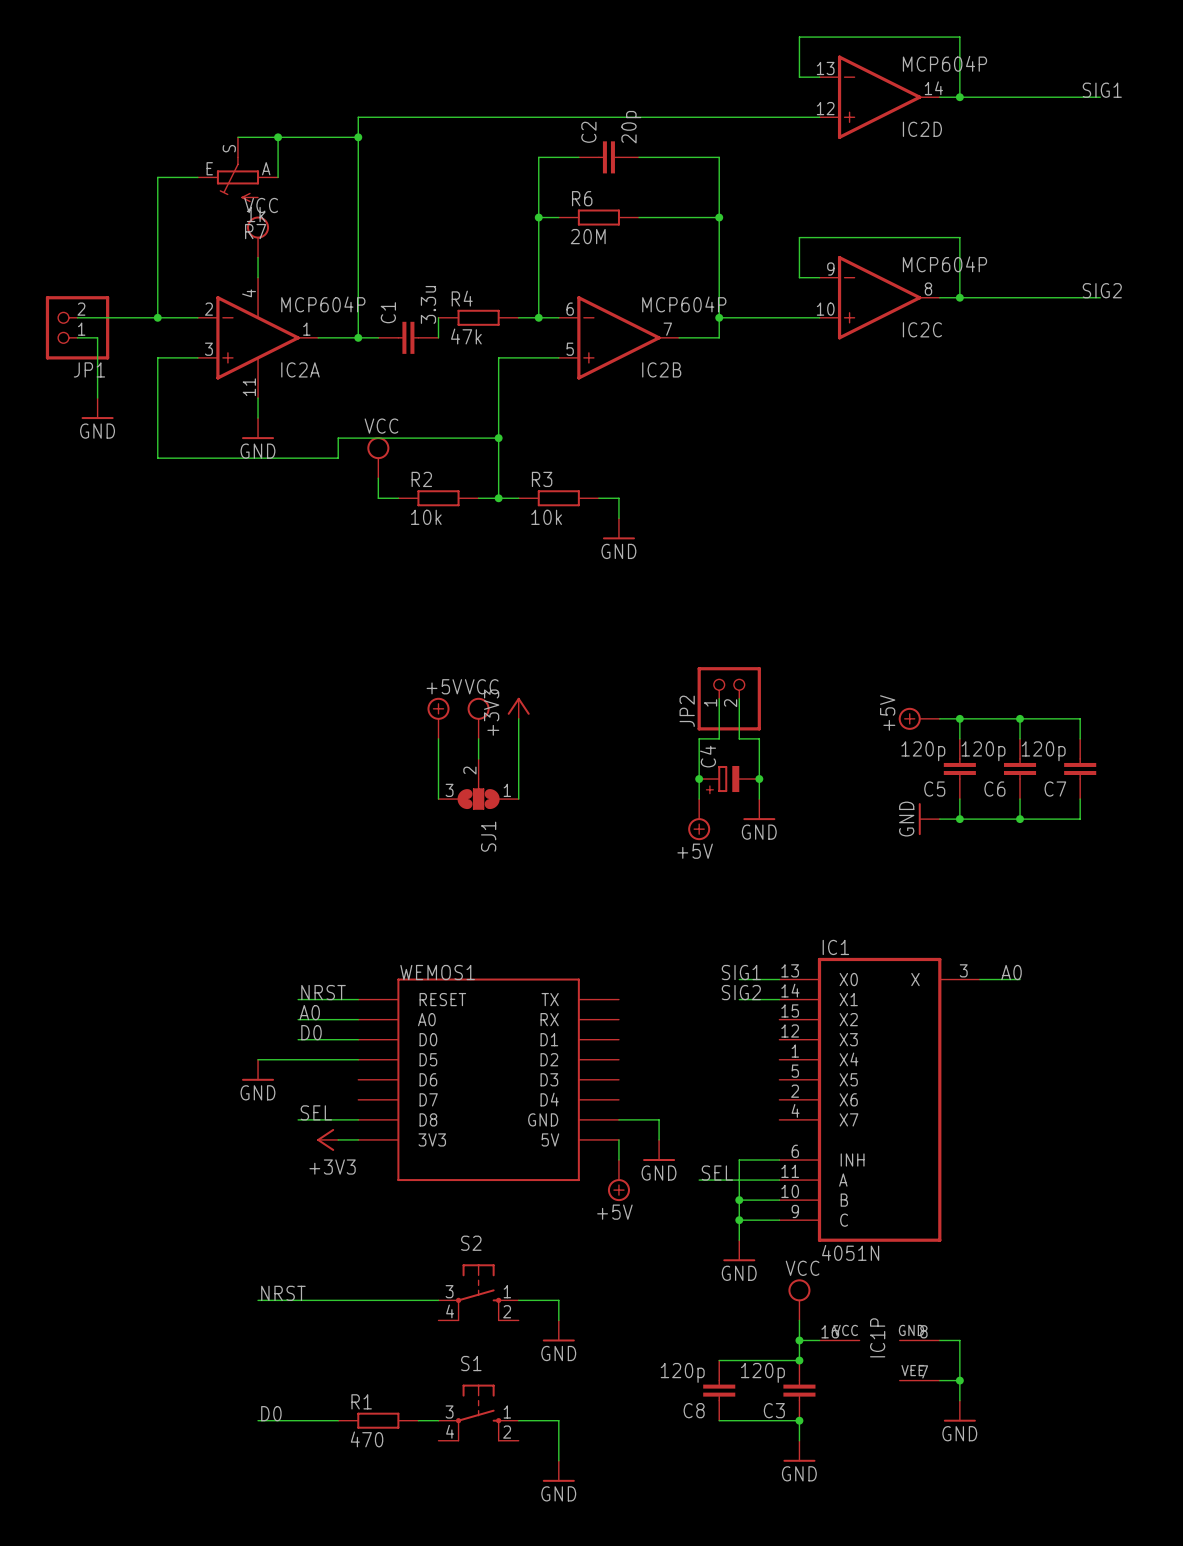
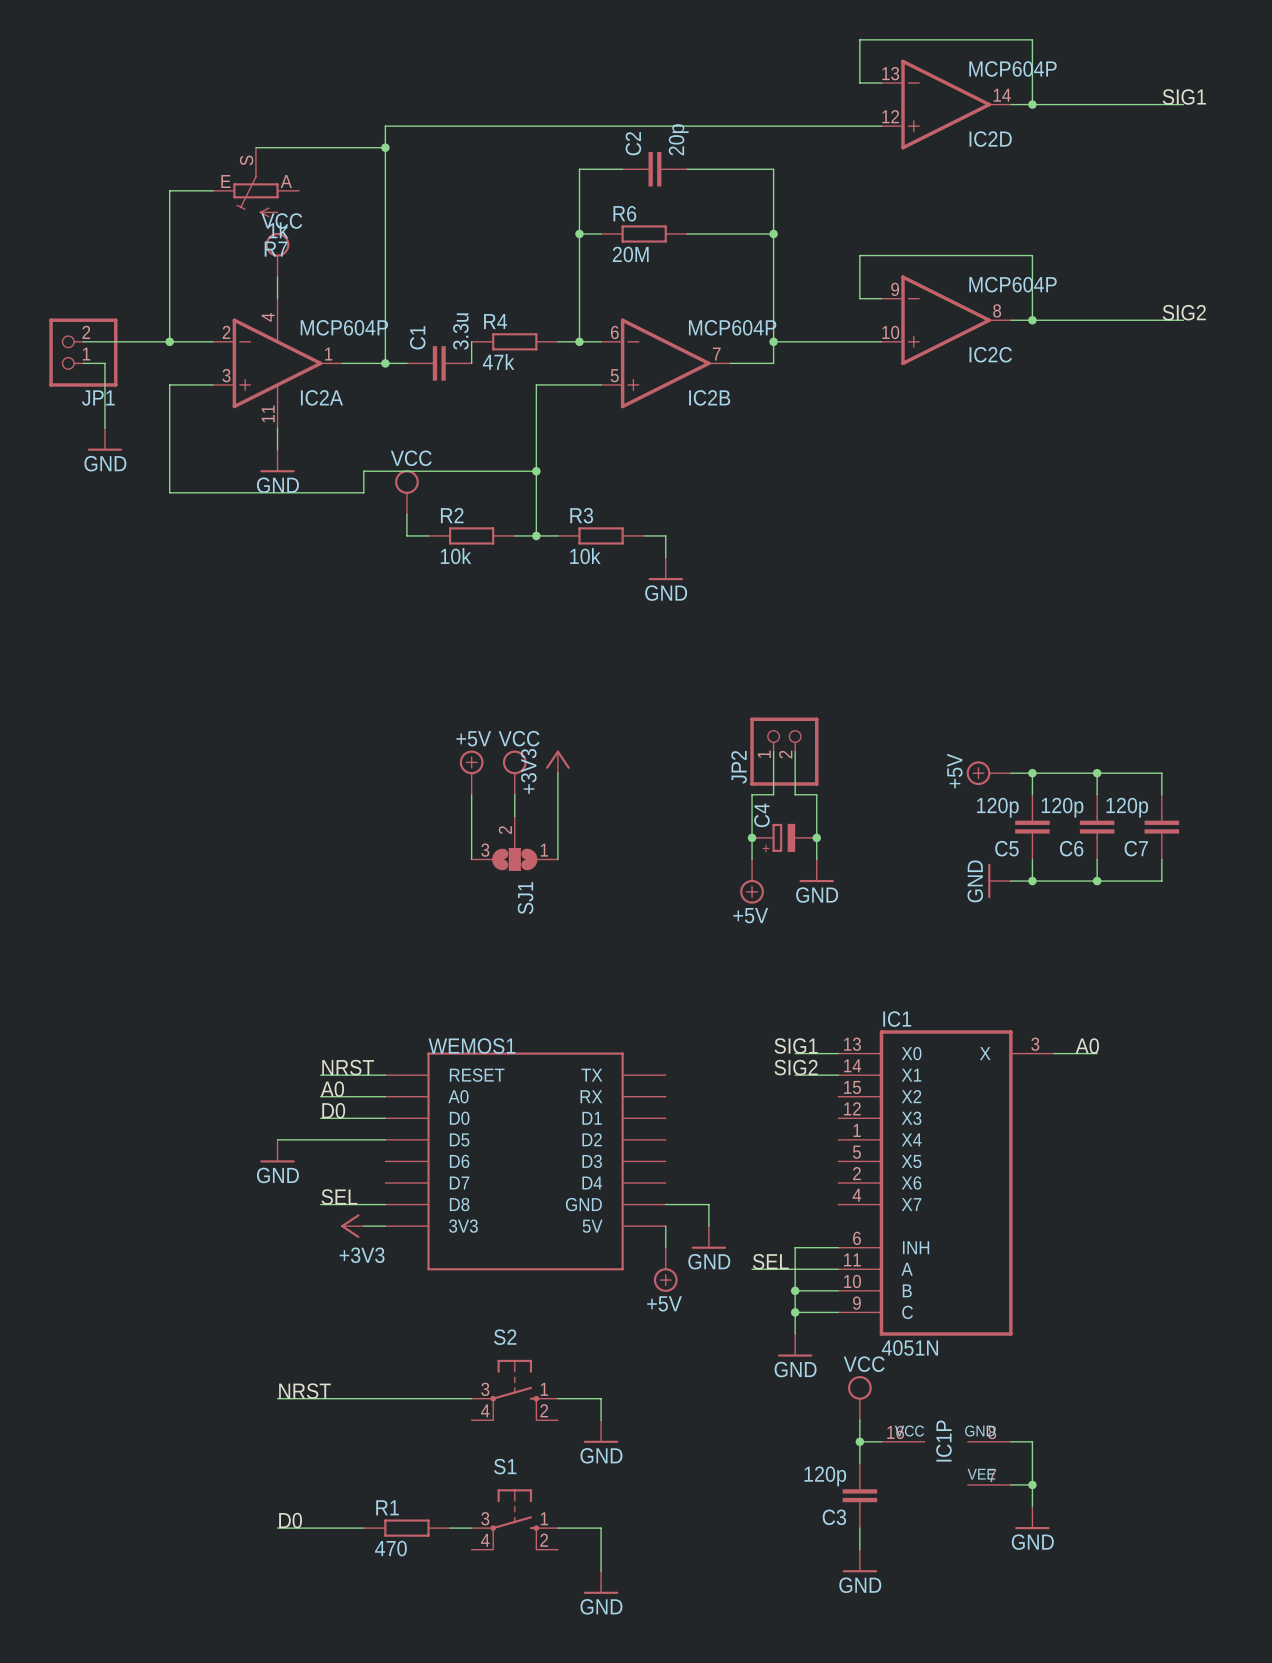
wire: (278, 137) (278, 177) -> none
junction: (278, 137) -> none
wire: (719, 1360) (799, 1360) -> none
junction: (799, 1360) -> none
C8: 120p (719, 1390) -> none
wire: (719, 1420) (799, 1420) -> none
junction: (799, 1420) -> none

